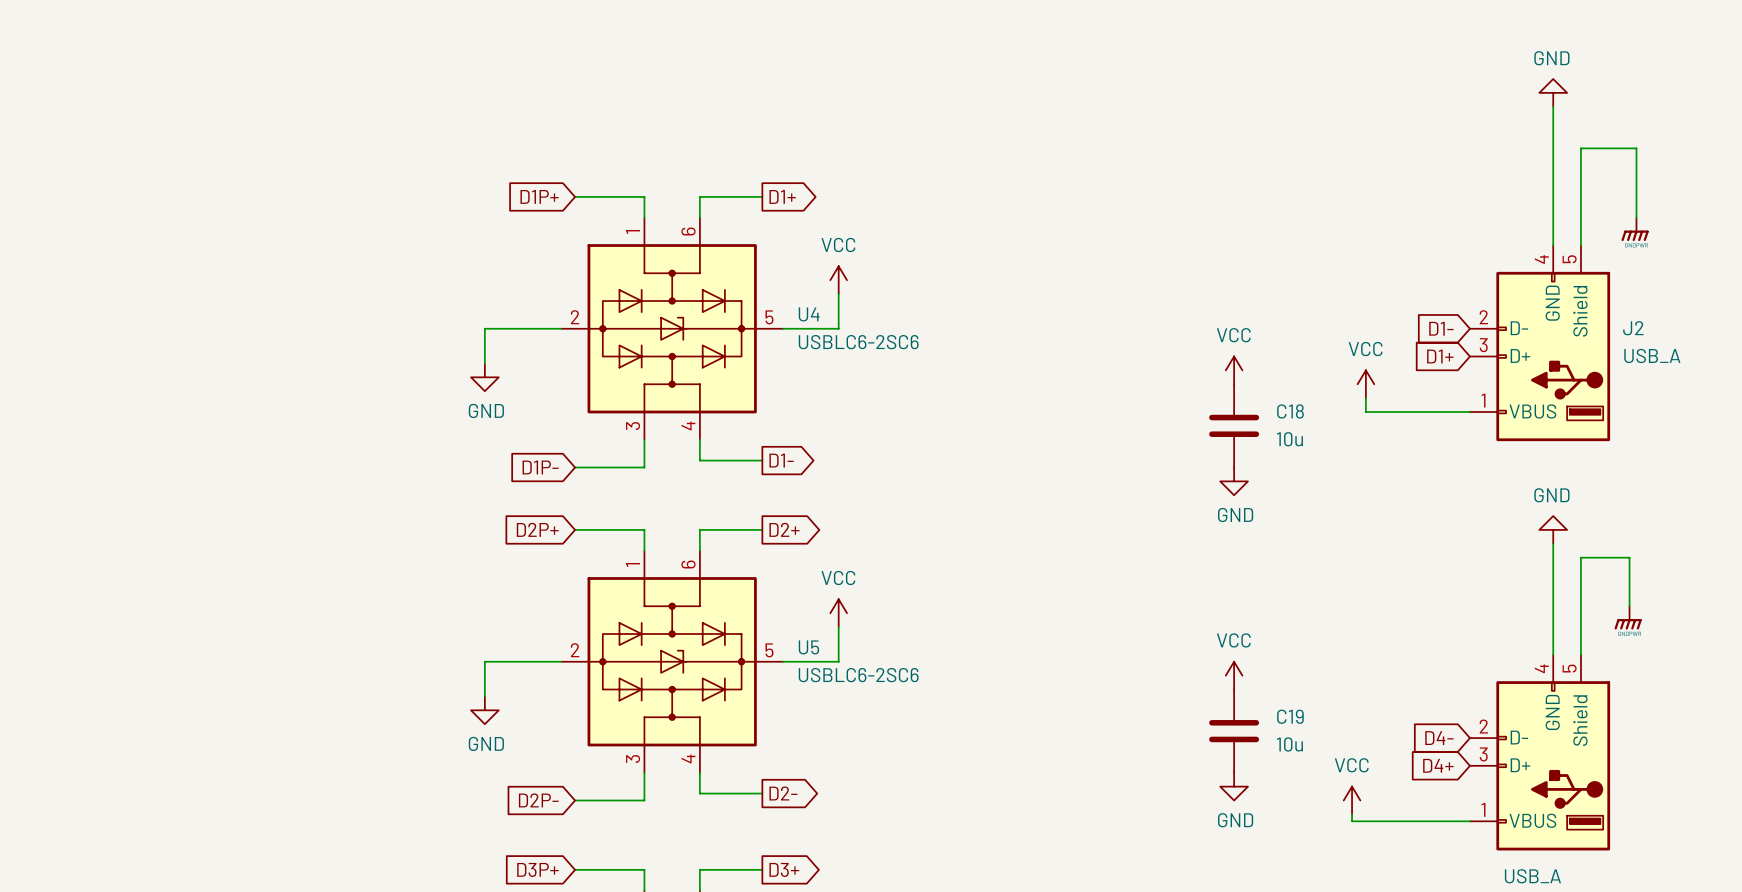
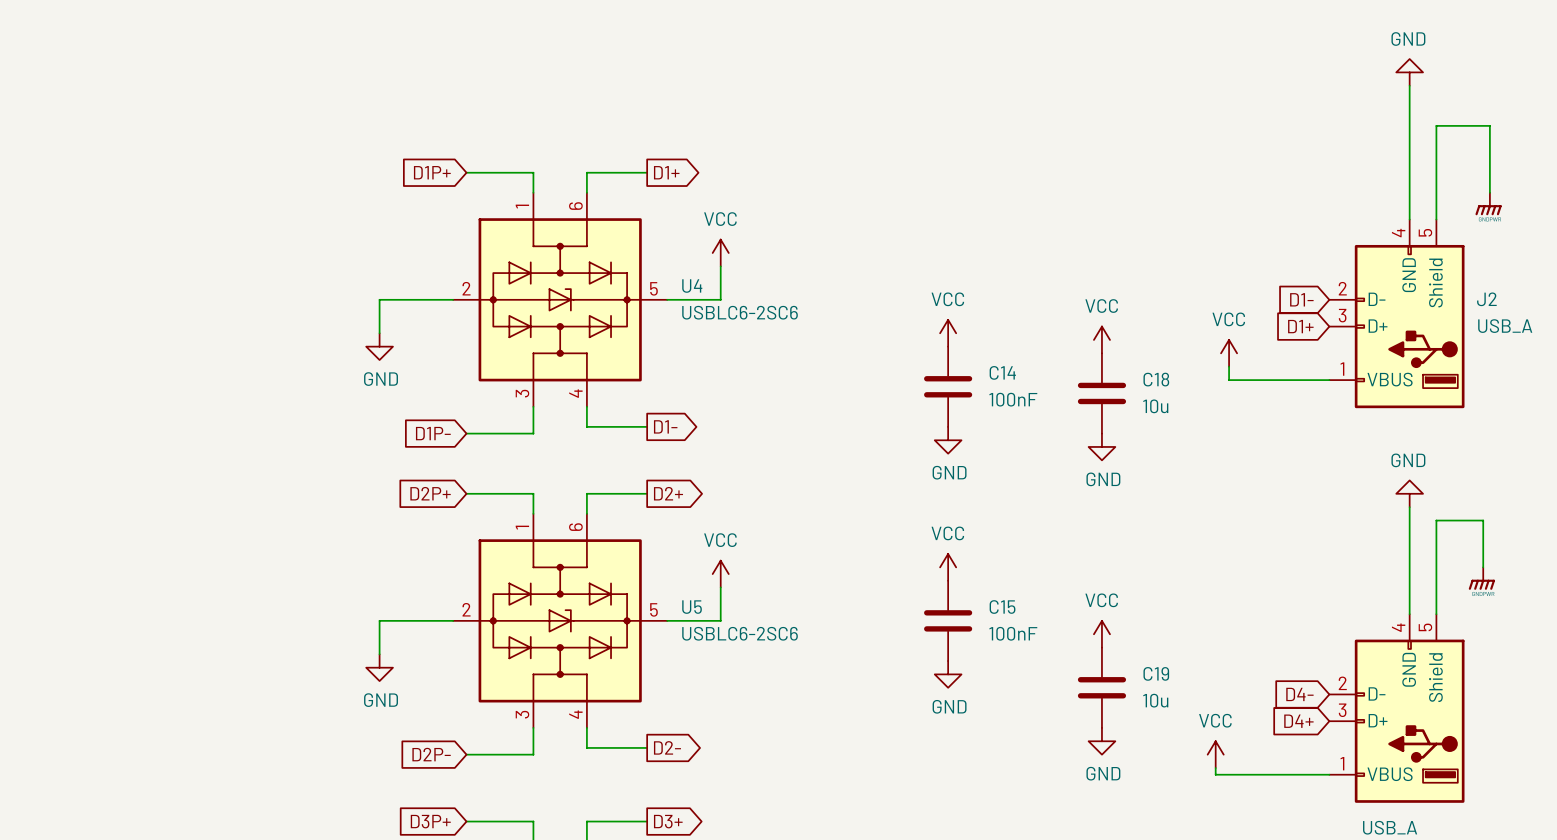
power symbol: none -> VCC (948, 333)
C14: none -> 100nF (948, 386)
power symbol: none -> GND (948, 440)
power symbol: none -> VCC (948, 567)
C15: none -> 100nF (948, 620)
power symbol: none -> GND (948, 674)

